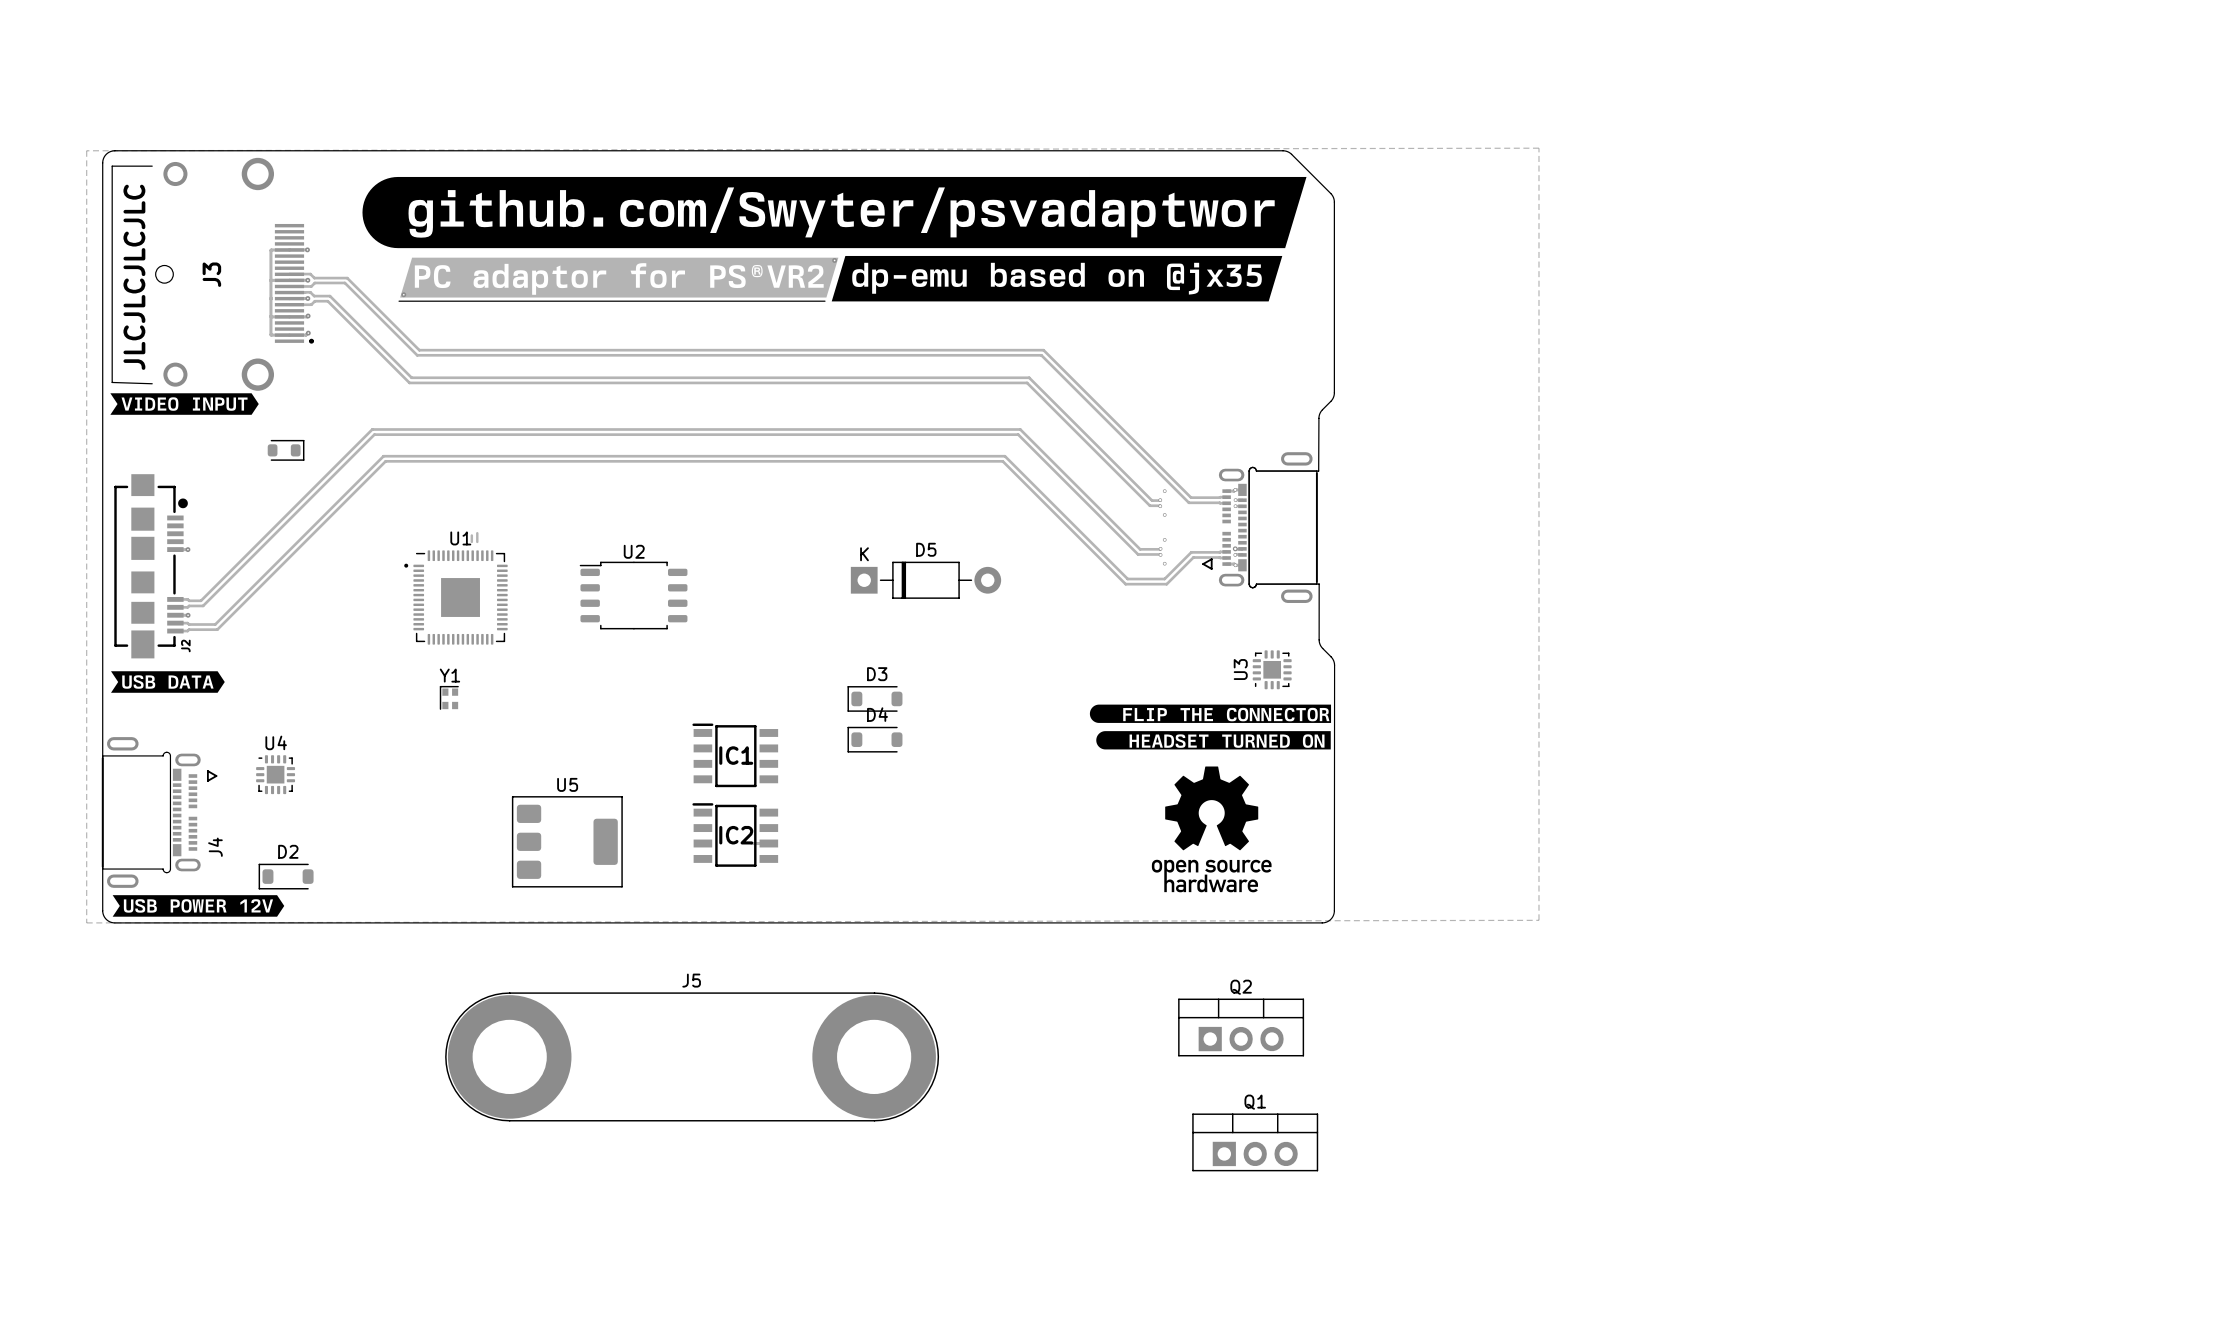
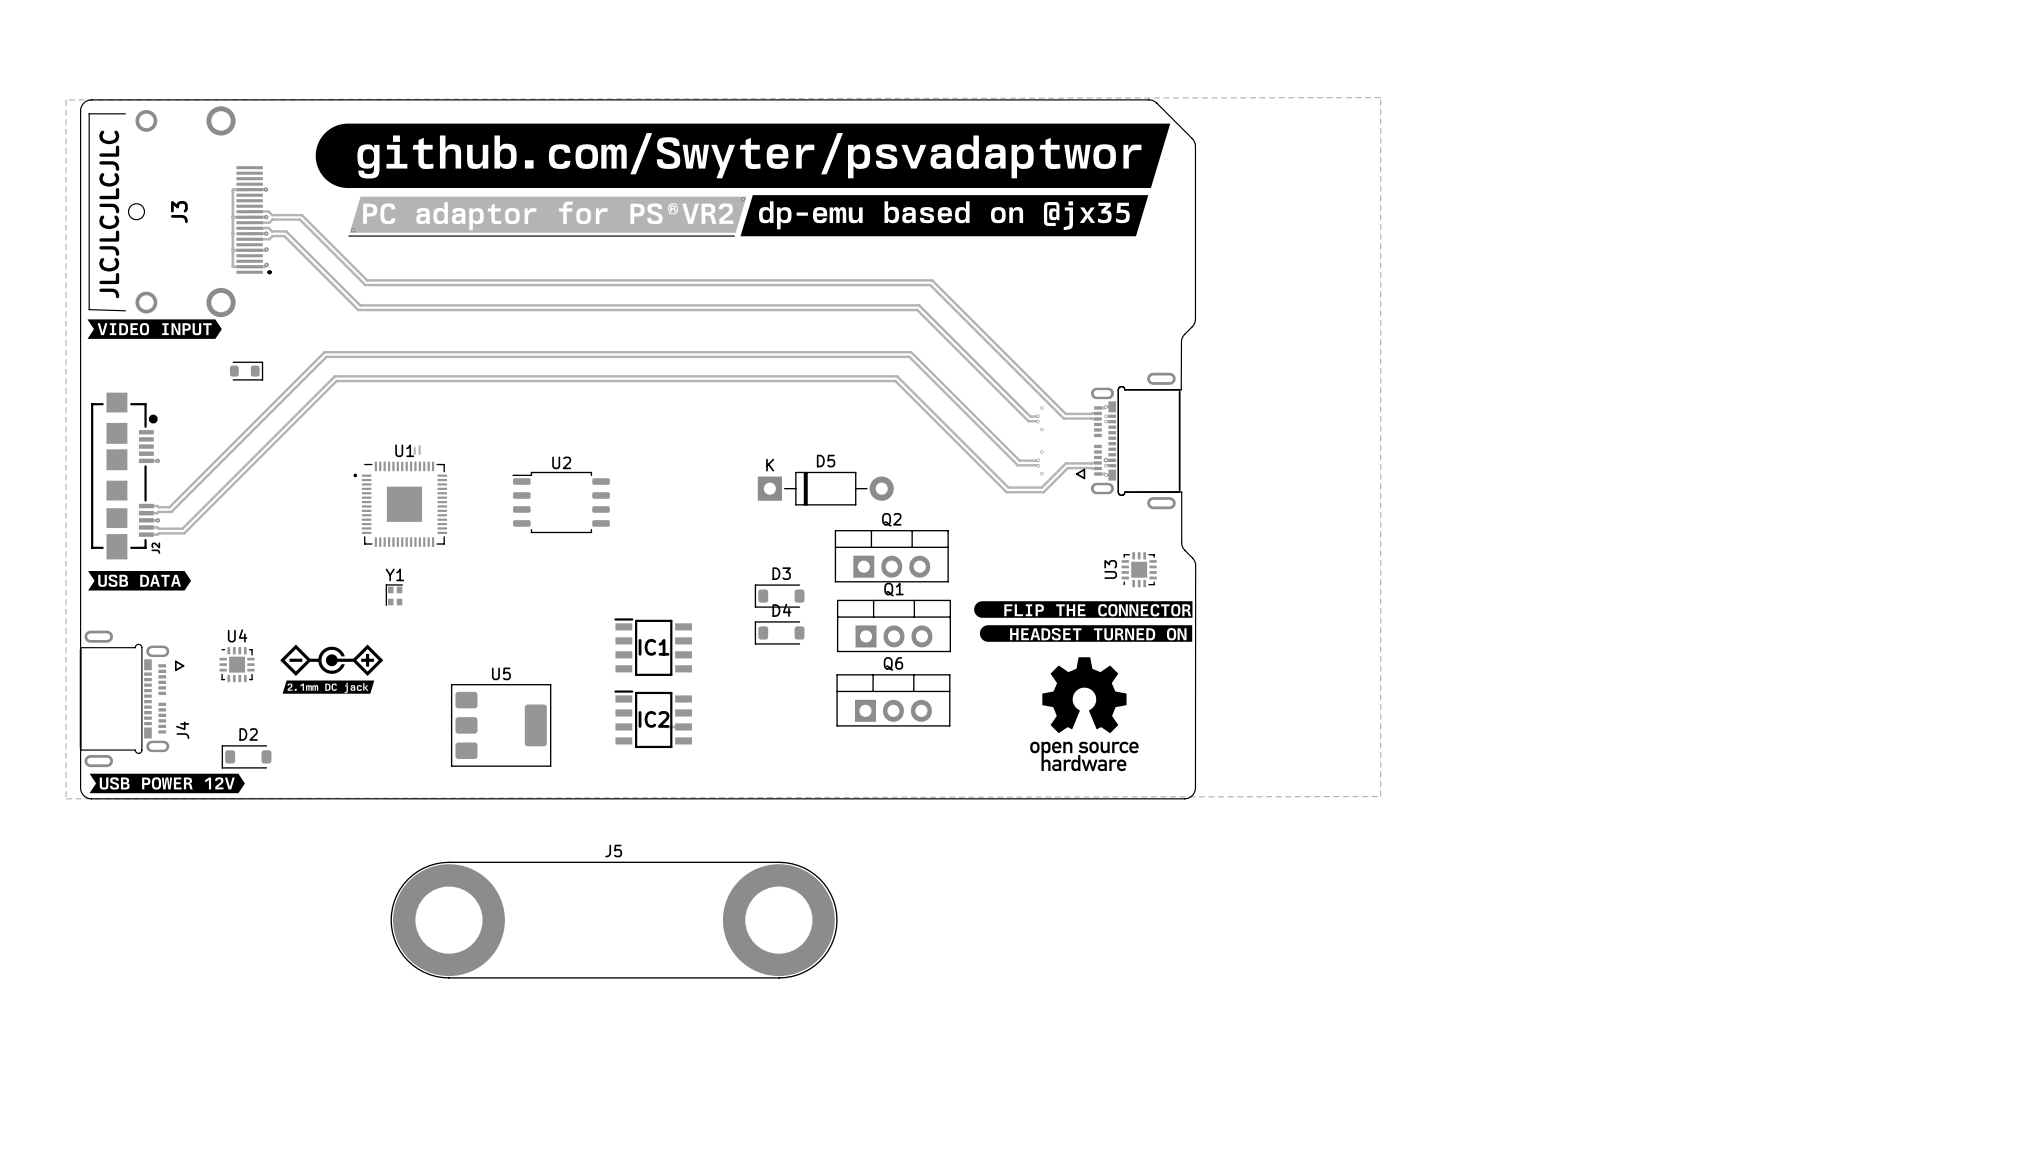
drawing: none -> [280, 644, 384, 694]
Q6: none -> (893, 700)
Q2 position: (1241, 1027) -> (891, 556)
Q1 position: (1255, 1142) -> (893, 625)

